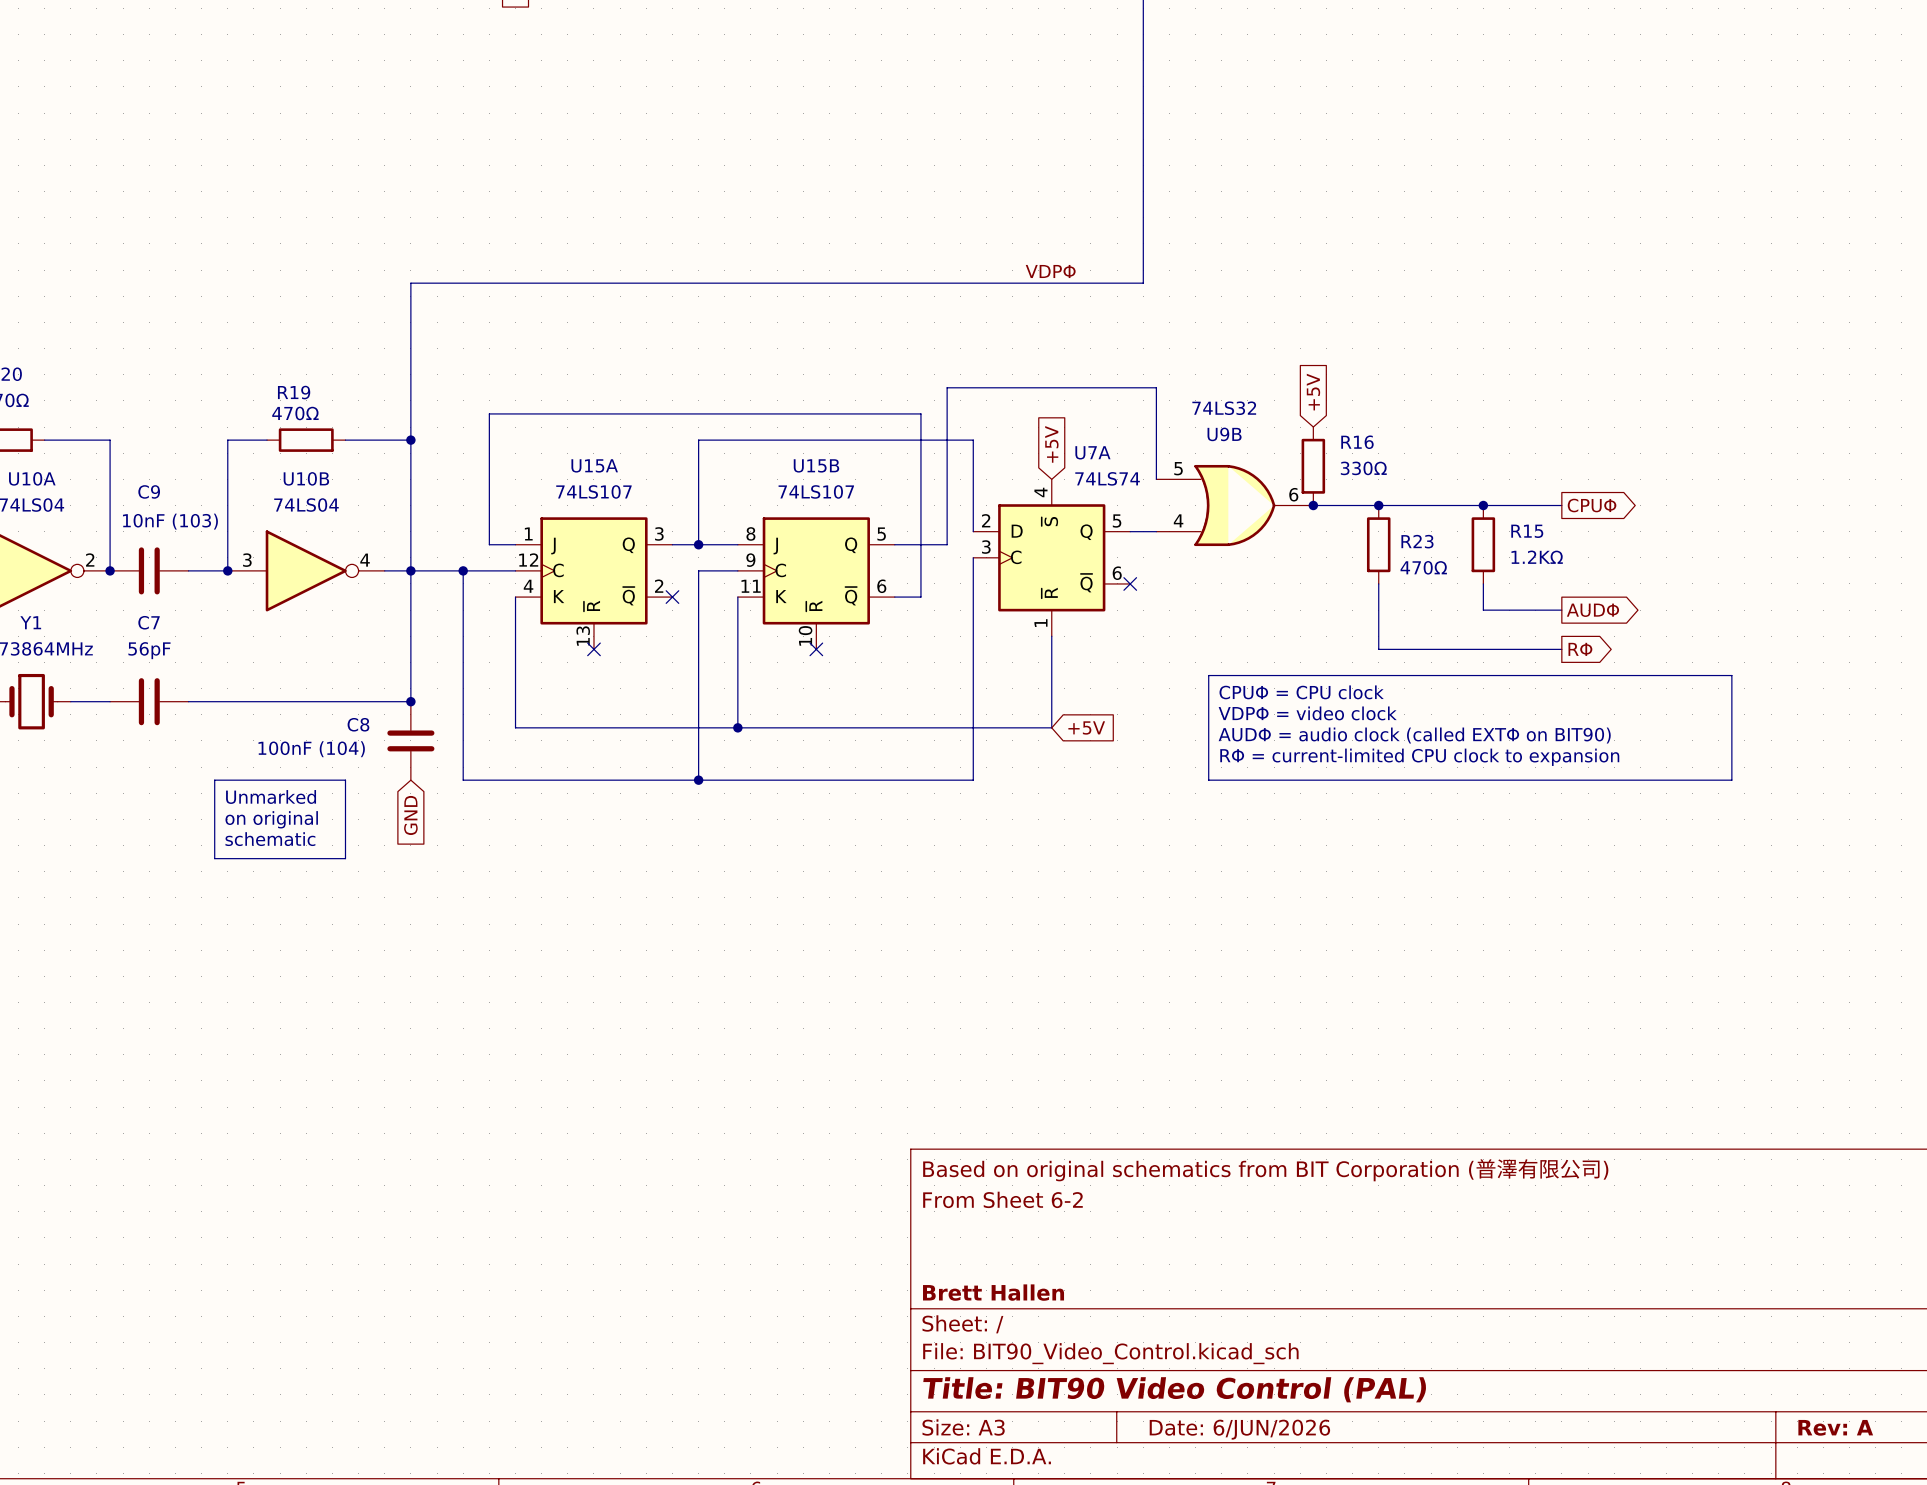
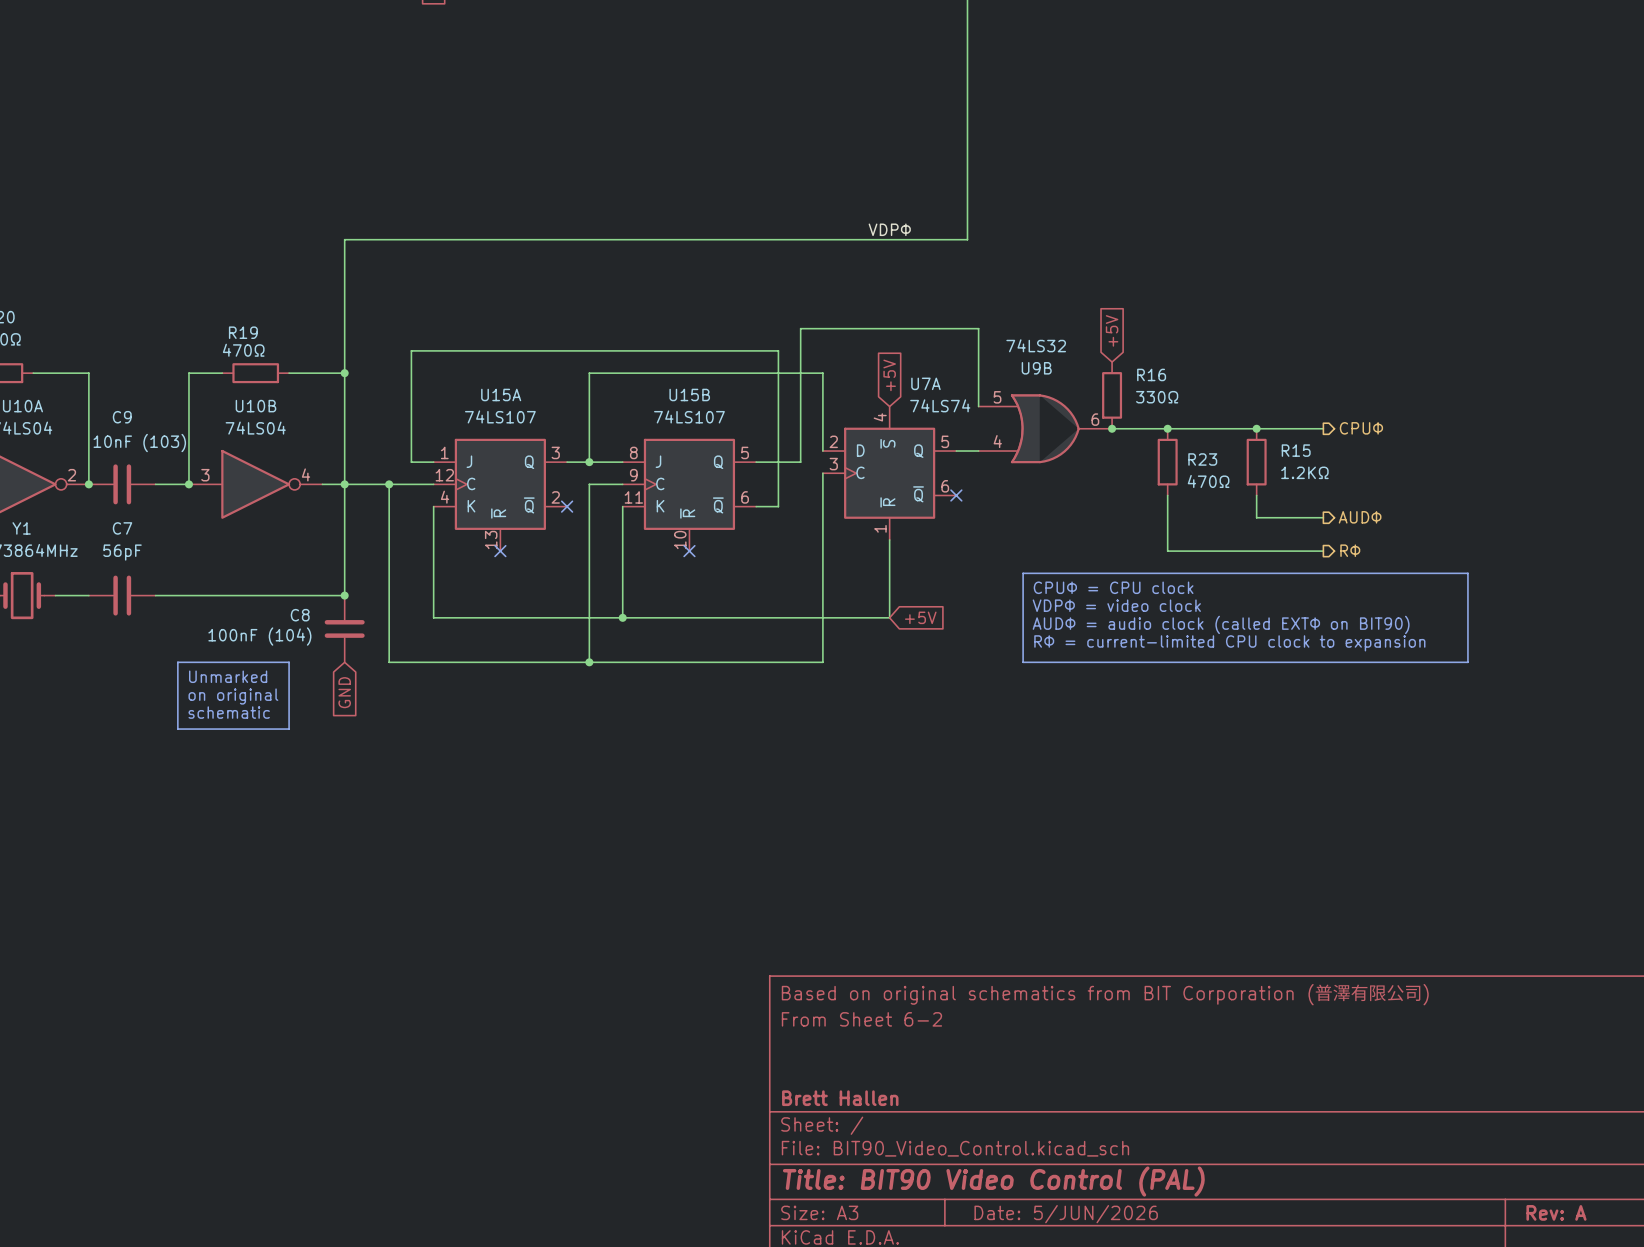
global label: CPUΦ (1592, 505) -> none
hierarchical label: none -> CPUΦ (1361, 428)
hierarchical label: none -> AUDΦ (1360, 517)
global label: AUDΦ (1592, 610) -> none
hierarchical label: none -> RΦ (1350, 550)
global label: RΦ (1580, 649) -> none
title block: Date: 6/JUN/2026 (1239, 1429) -> Date: 5/JUN/2026 (1066, 1214)

